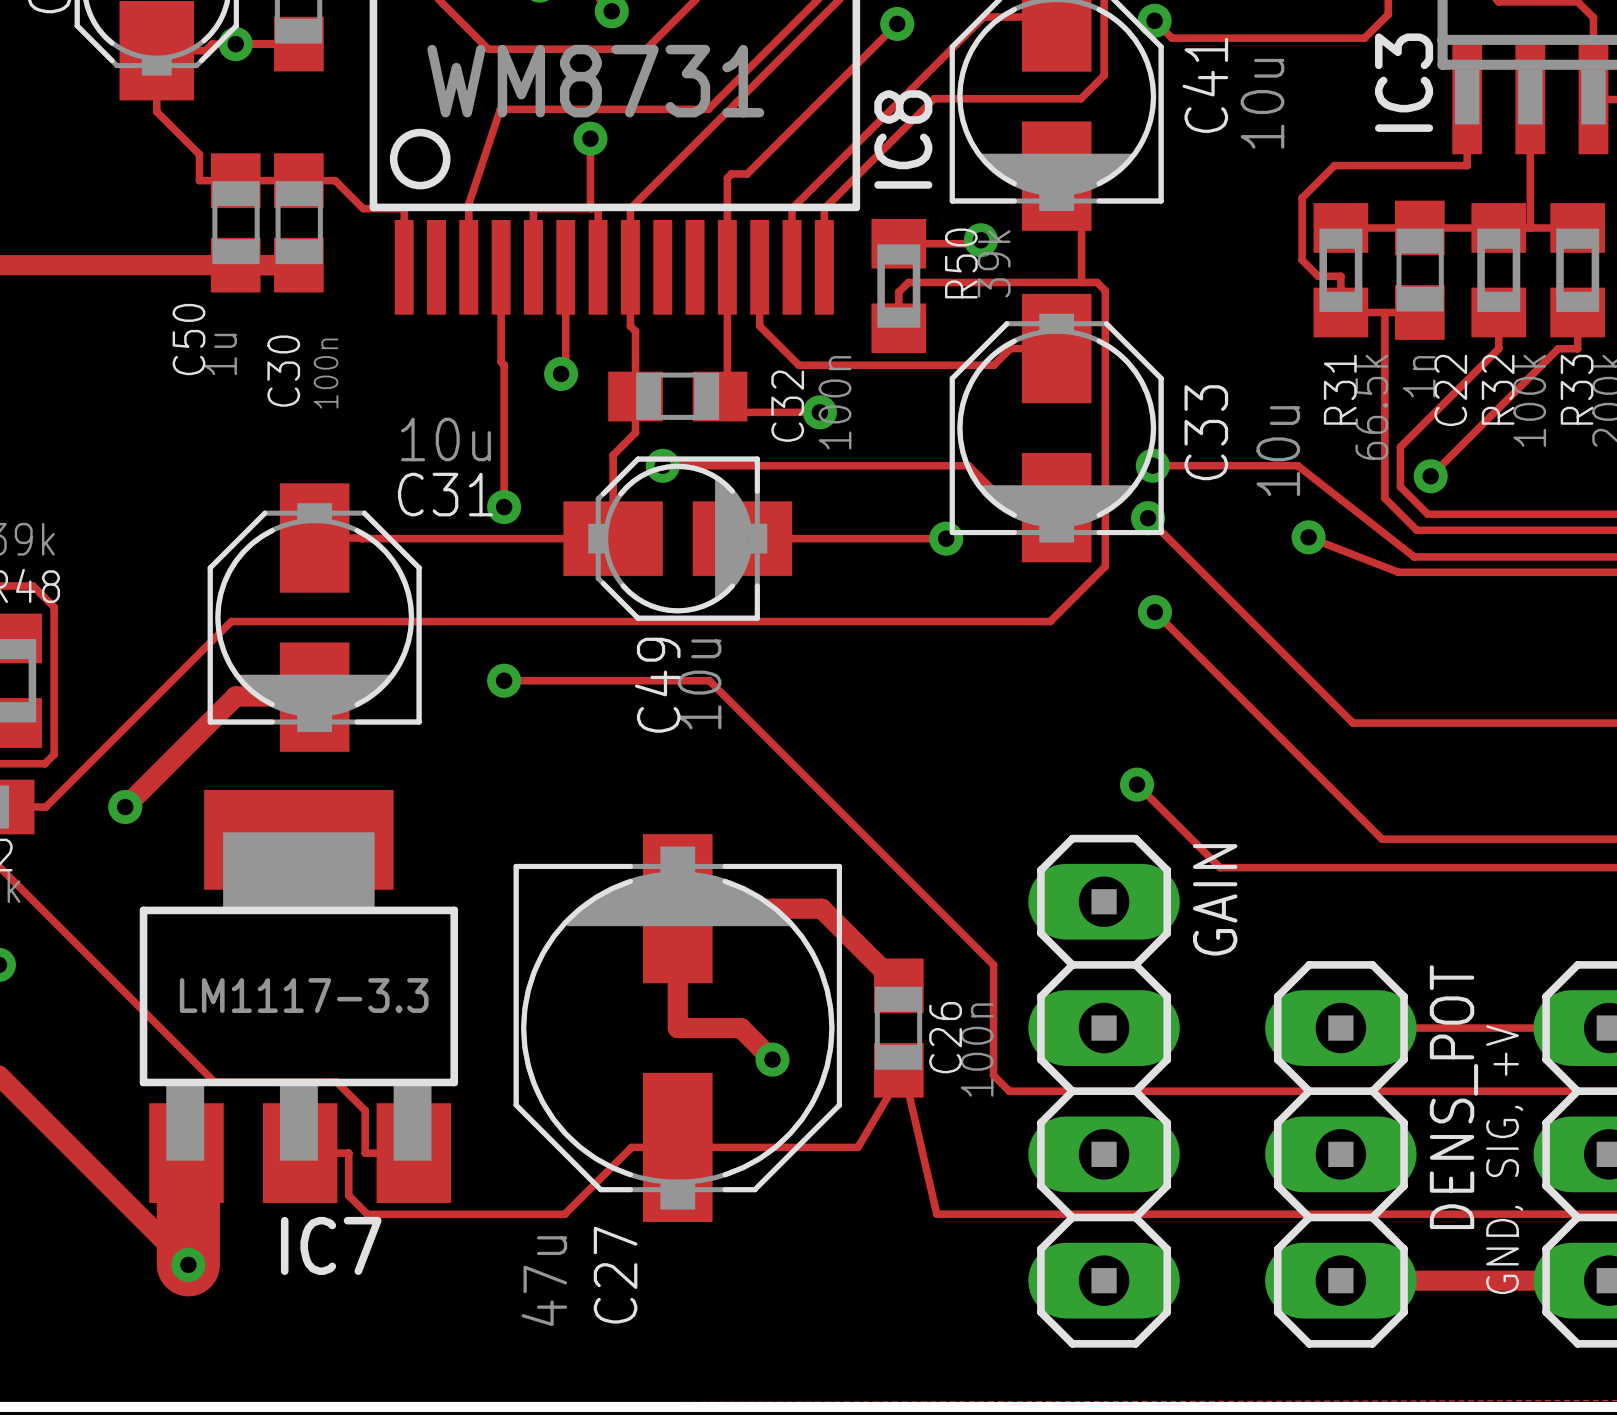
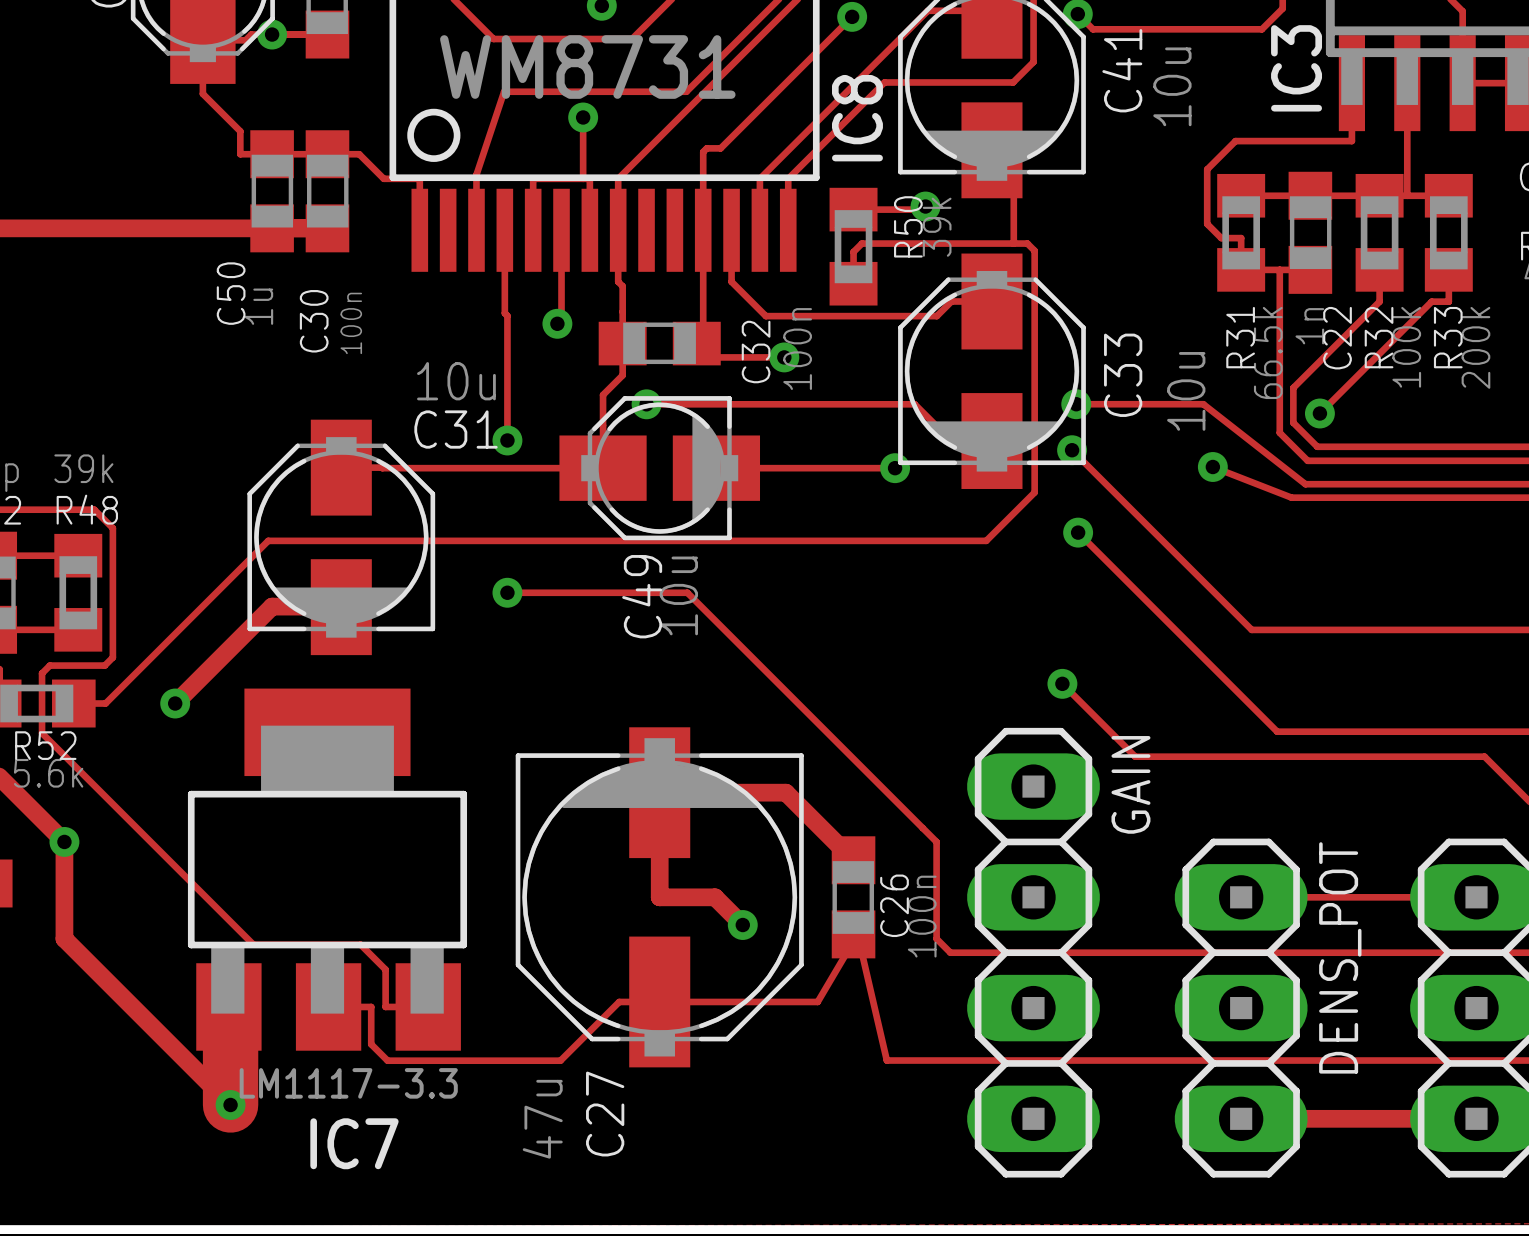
IC7 value position: LM1117-3.3 (304, 995) -> LM1117-3.3 (348, 1083)
text: GND, SIG, +V (1504, 1159) -> none
IC7 name position: IC7 (331, 1245) -> IC7 (354, 1143)

